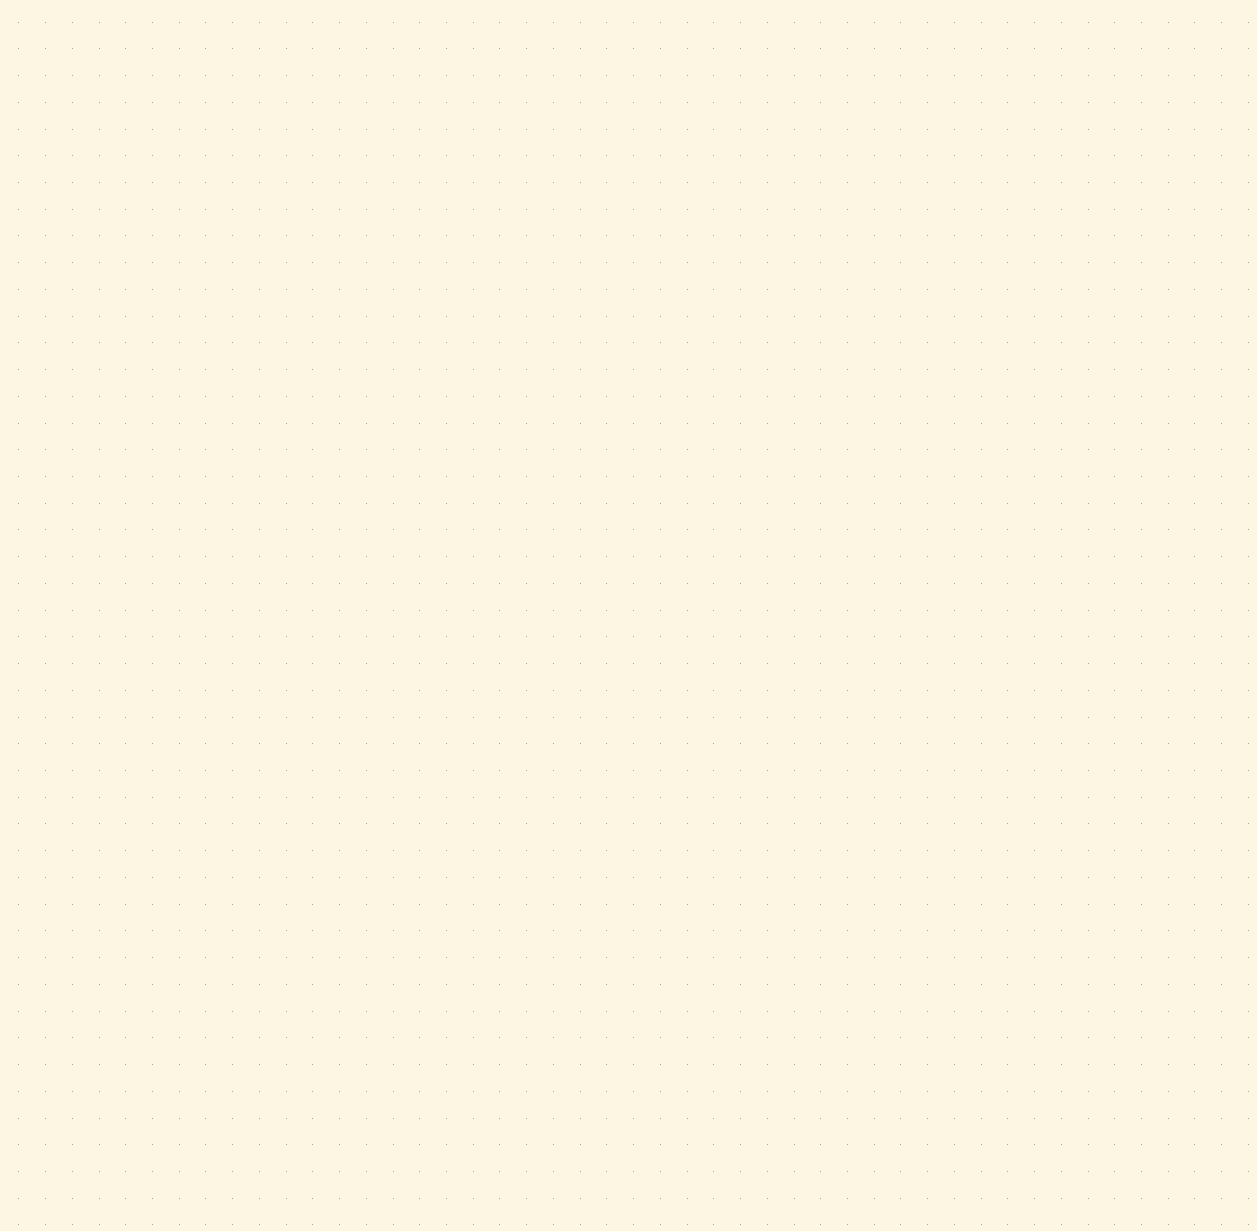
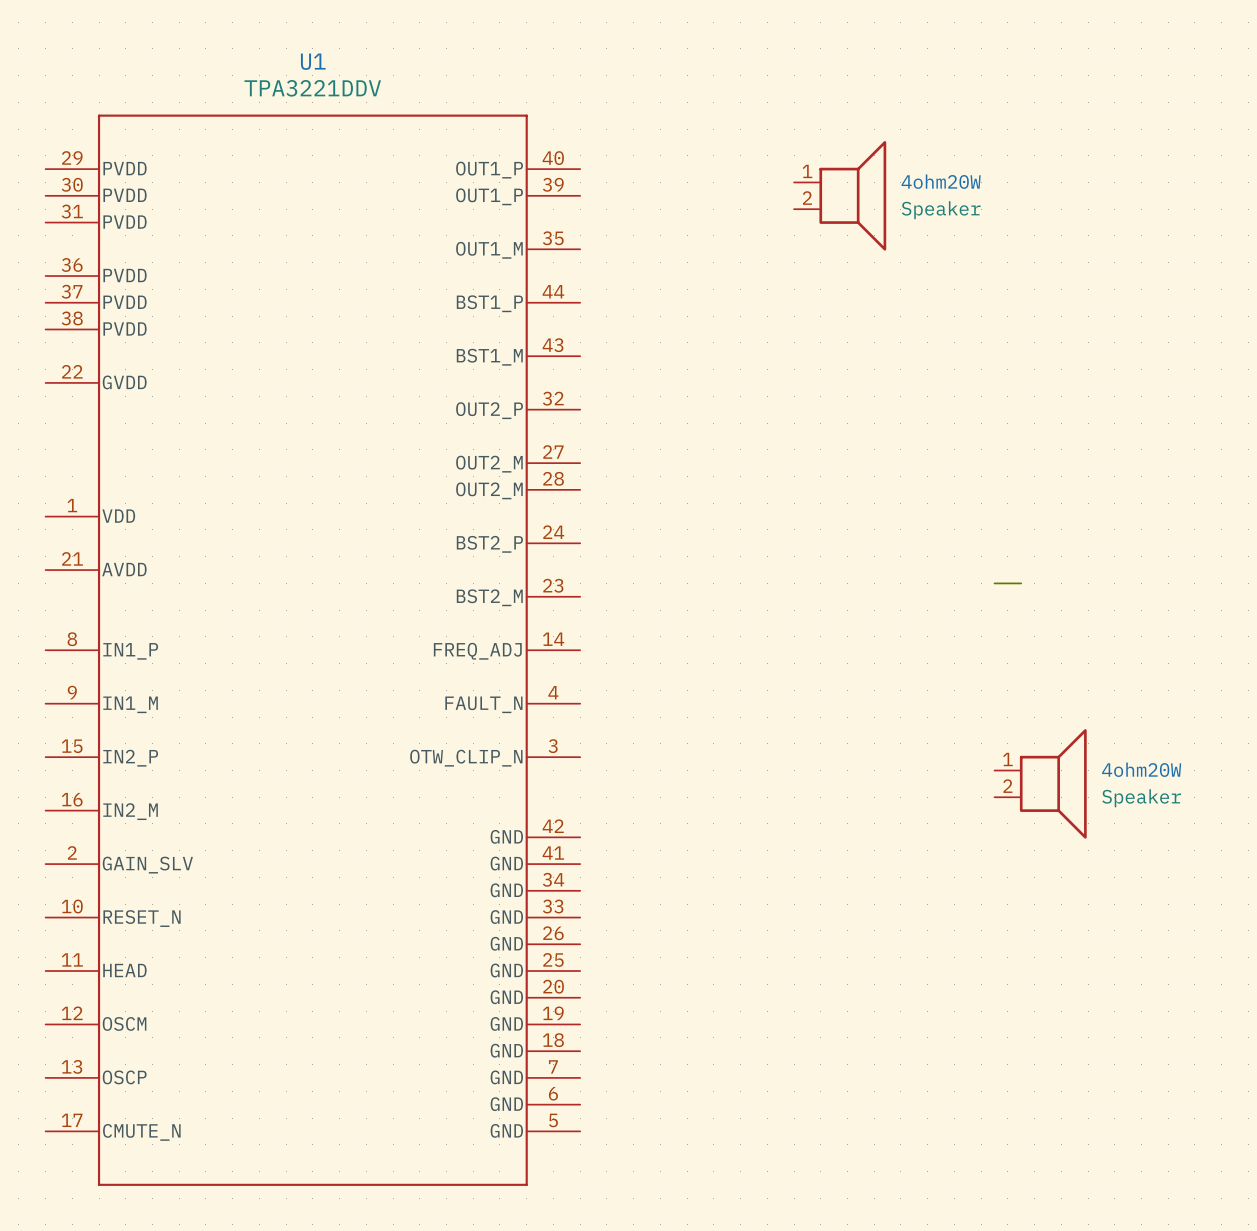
4ohm20W: none -> Speaker (840, 195)
wire: none -> (994, 583) (1021, 583)
U1: none -> TPA3221DDV (312, 650)
4ohm20W: none -> Speaker (1040, 783)

